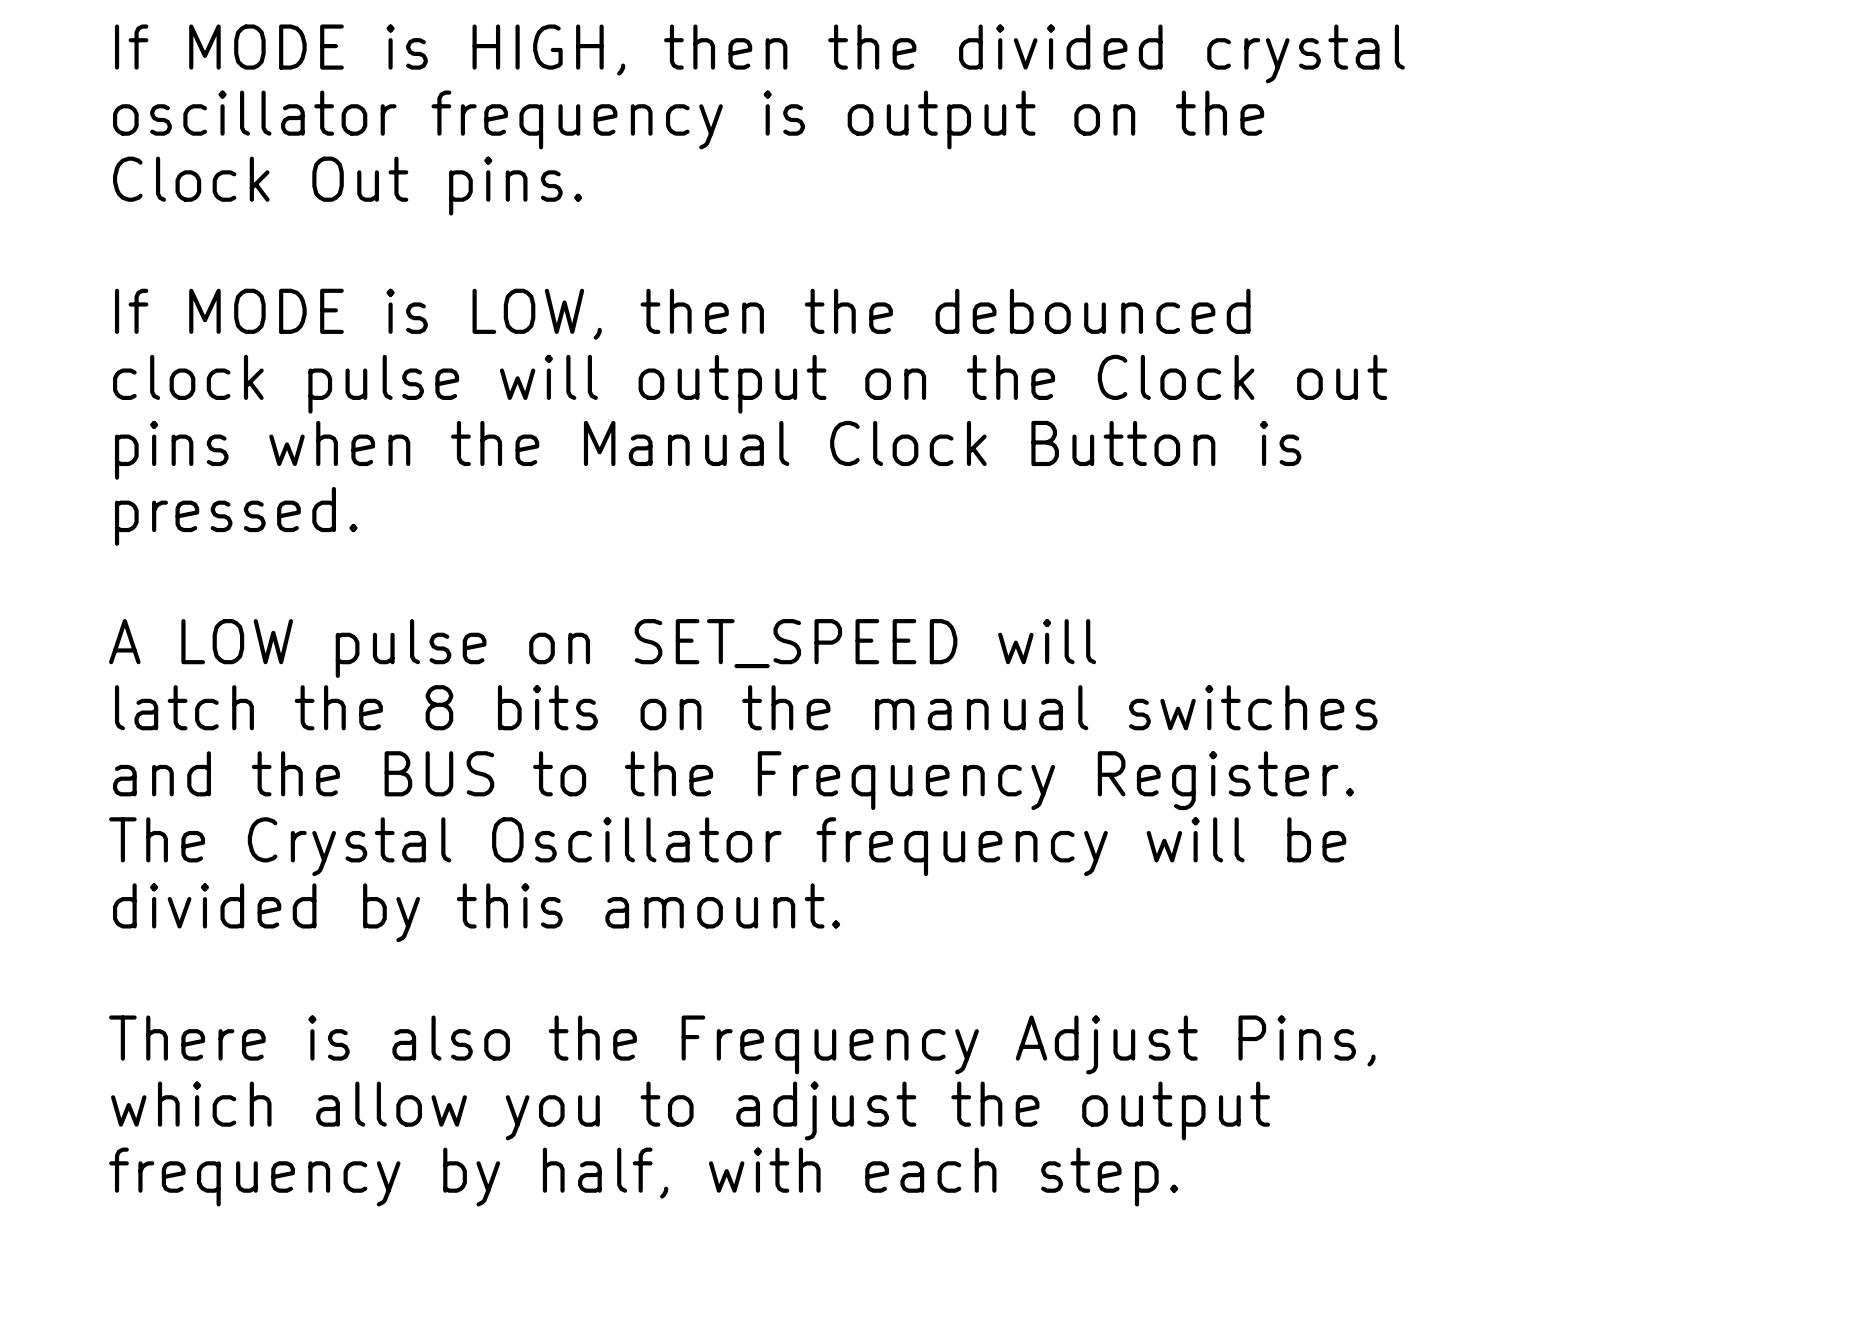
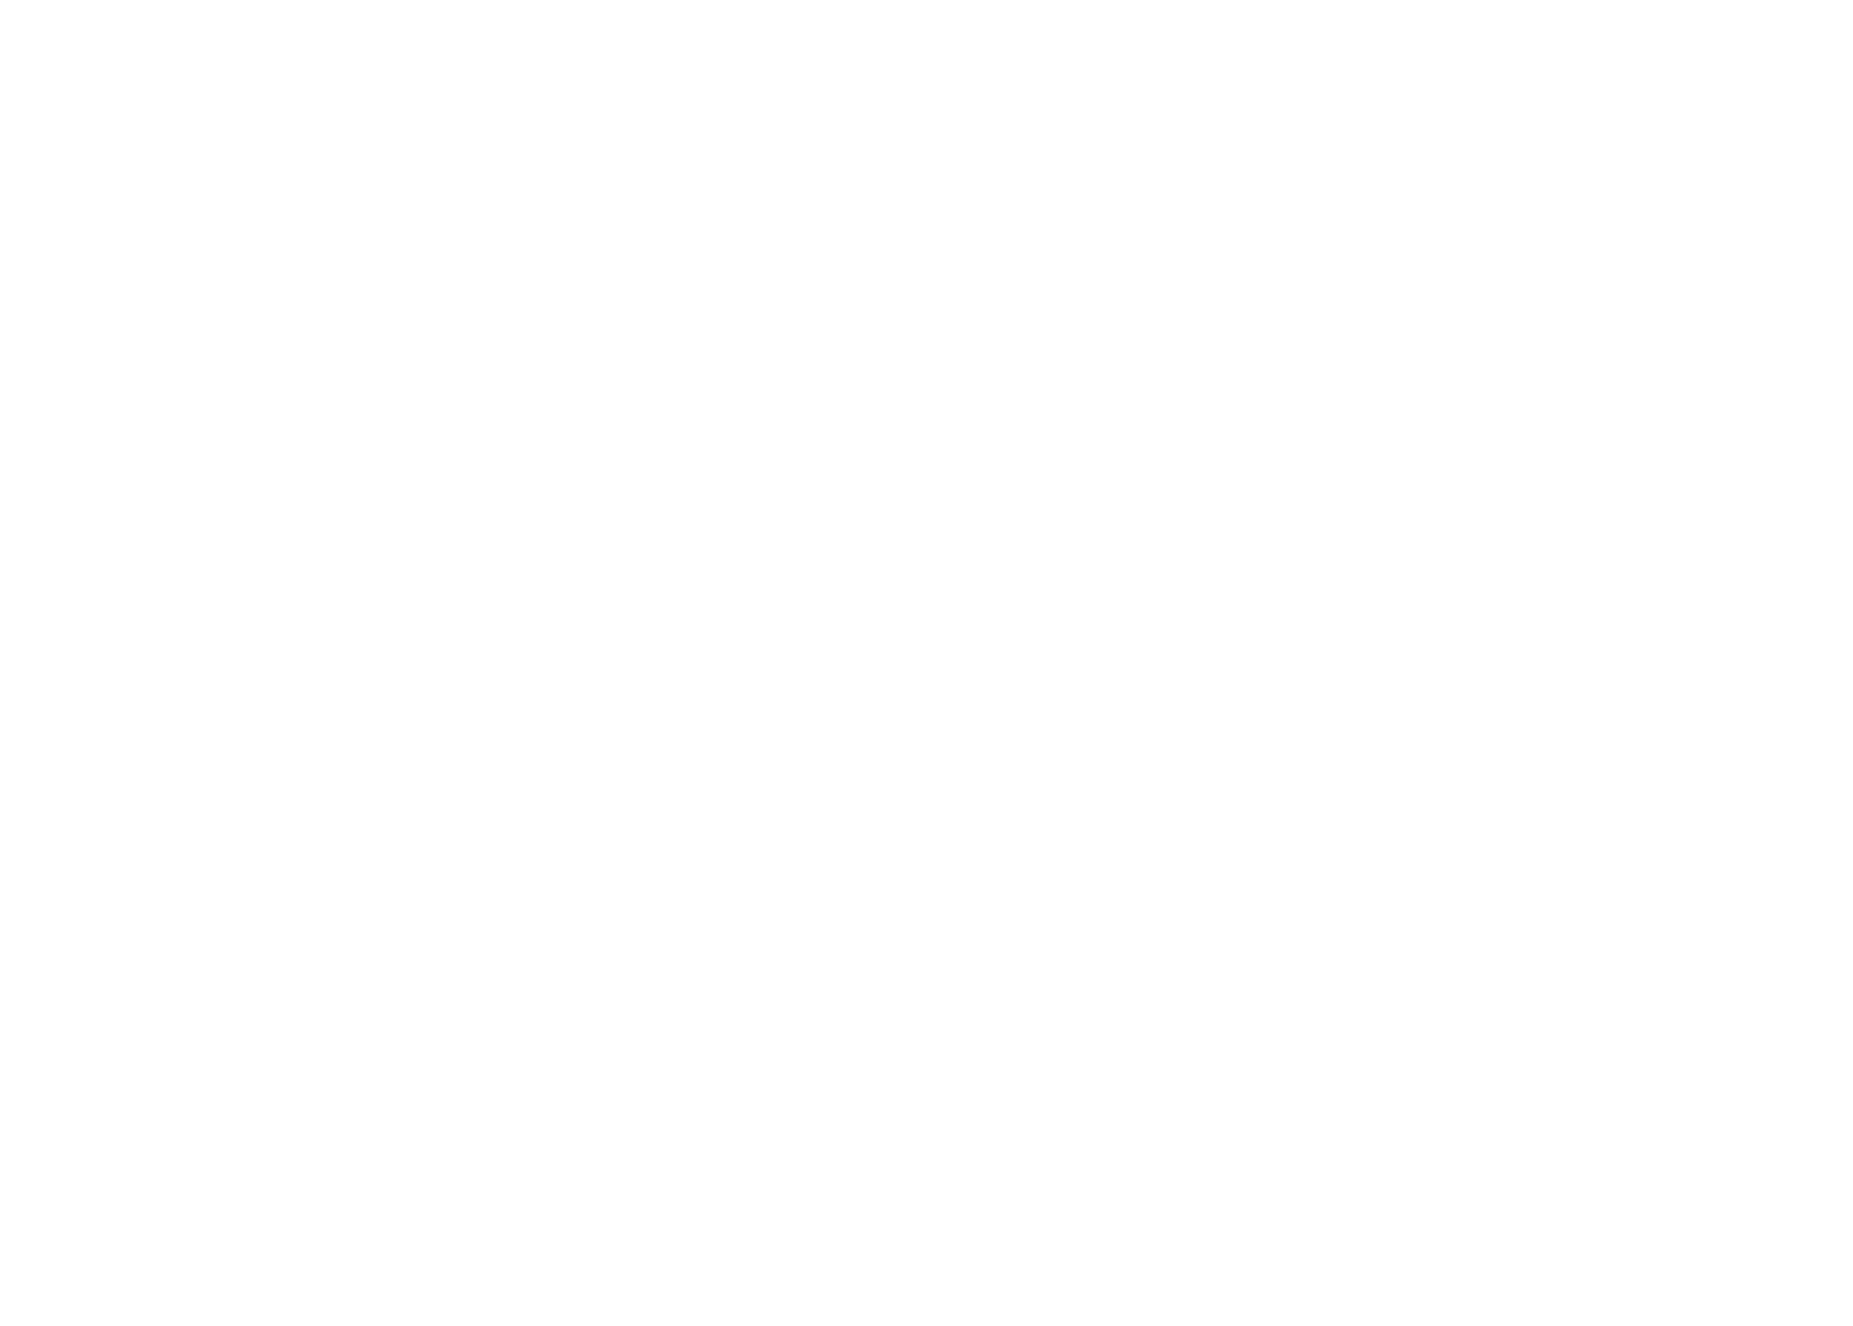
text: If MODE is HIGH, then the divided crystal (759, 53) -> none
text: oscillator frequency is output on the (688, 119) -> none
text: Clock Out pins. (347, 186) -> none
text: If MODE is LOW, then the debounced (682, 314) -> none
text: clock pulse will output on the Clock out (750, 384) -> none
text: pins when the Manual Clock Button is (708, 450) -> none
text: pressed. (236, 516) -> none
text: A LOW pulse on SET_SPEED will (602, 648) -> none
text: latch the 8 bits on the manual switches (746, 707) -> none
text: and the BUS to the Frequency Register. (733, 780) -> none
text: The Crystal Oscillator frequency will be (727, 846) -> none
text: divided by this amount. (476, 912) -> none
text: There is also the Frequency Adjust Pins, (742, 1044) -> none
text: which allow you to adjust the output (690, 1110) -> none
text: frequency by half, with each step. (643, 1177) -> none

